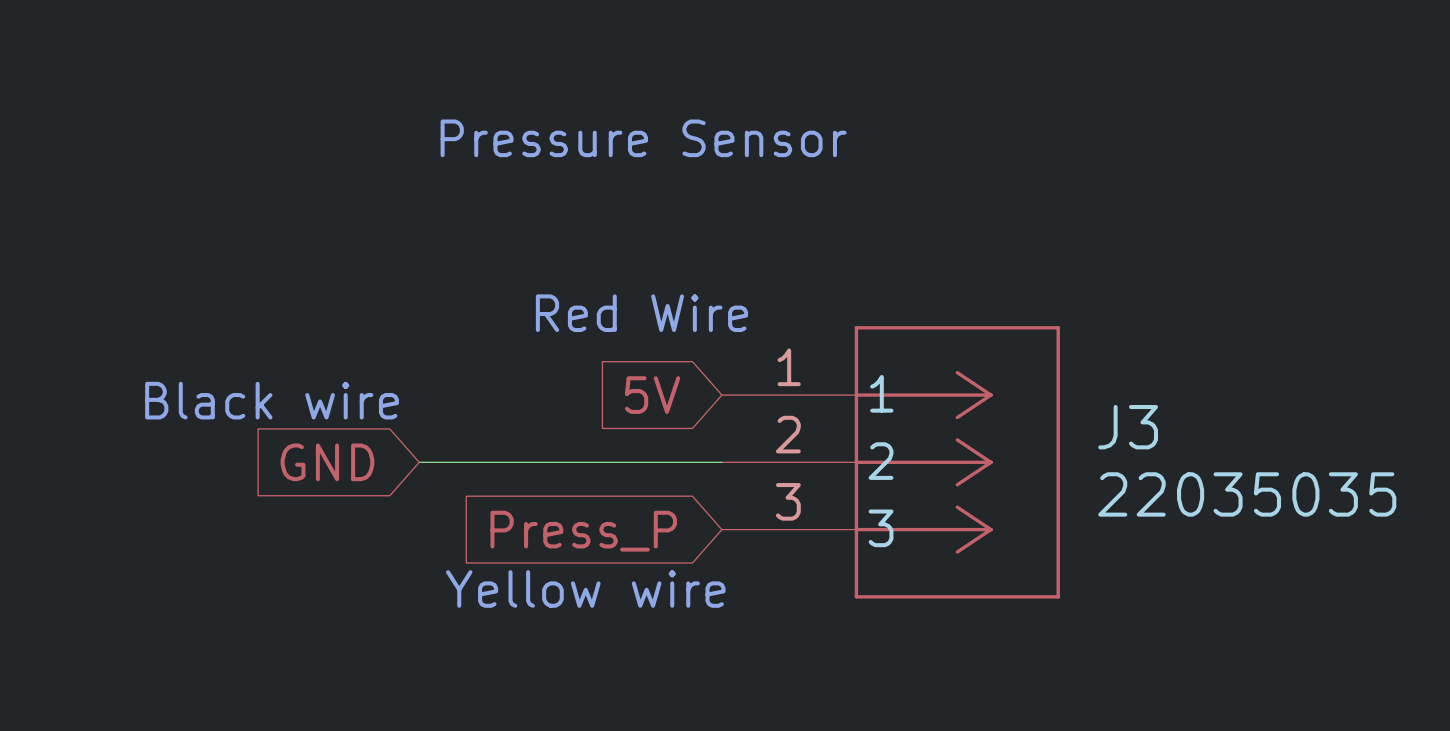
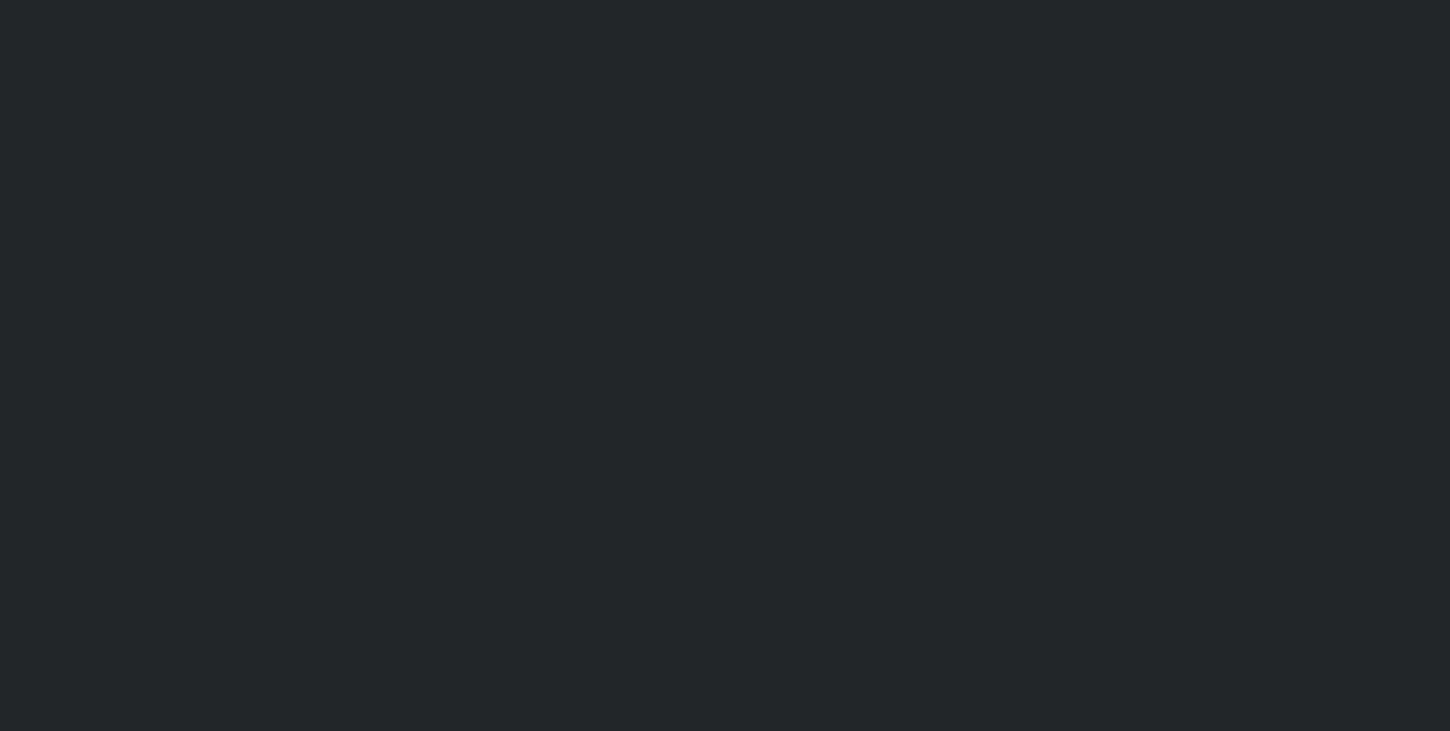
text: Pressure Sensor (643, 138) -> none
text: Red Wire (641, 313) -> none
global label: 5V (652, 395) -> none
text: Black wire (272, 400) -> none
global label: GND (327, 462) -> none
wire: (419, 462) (721, 462) -> none
J3: 22035035 (890, 462) -> none
global label: Press_P (583, 531) -> none
text: Yellow wire (585, 588) -> none

